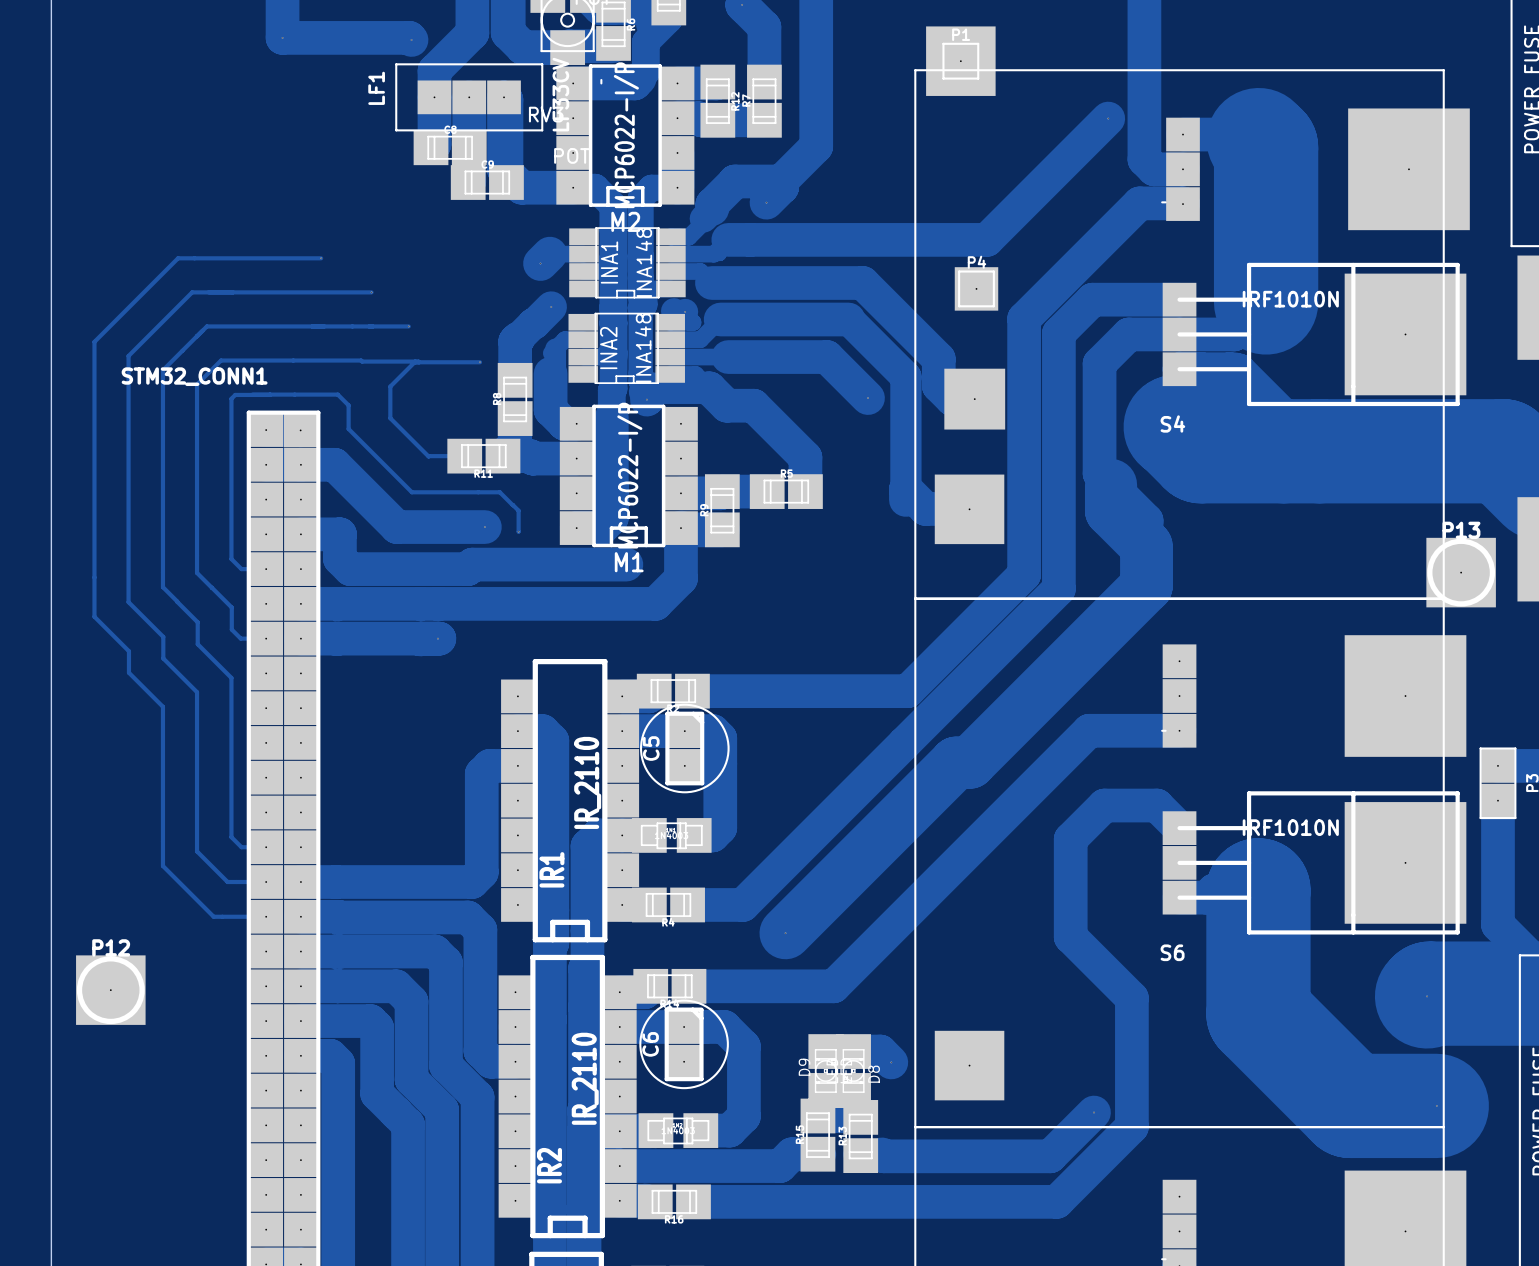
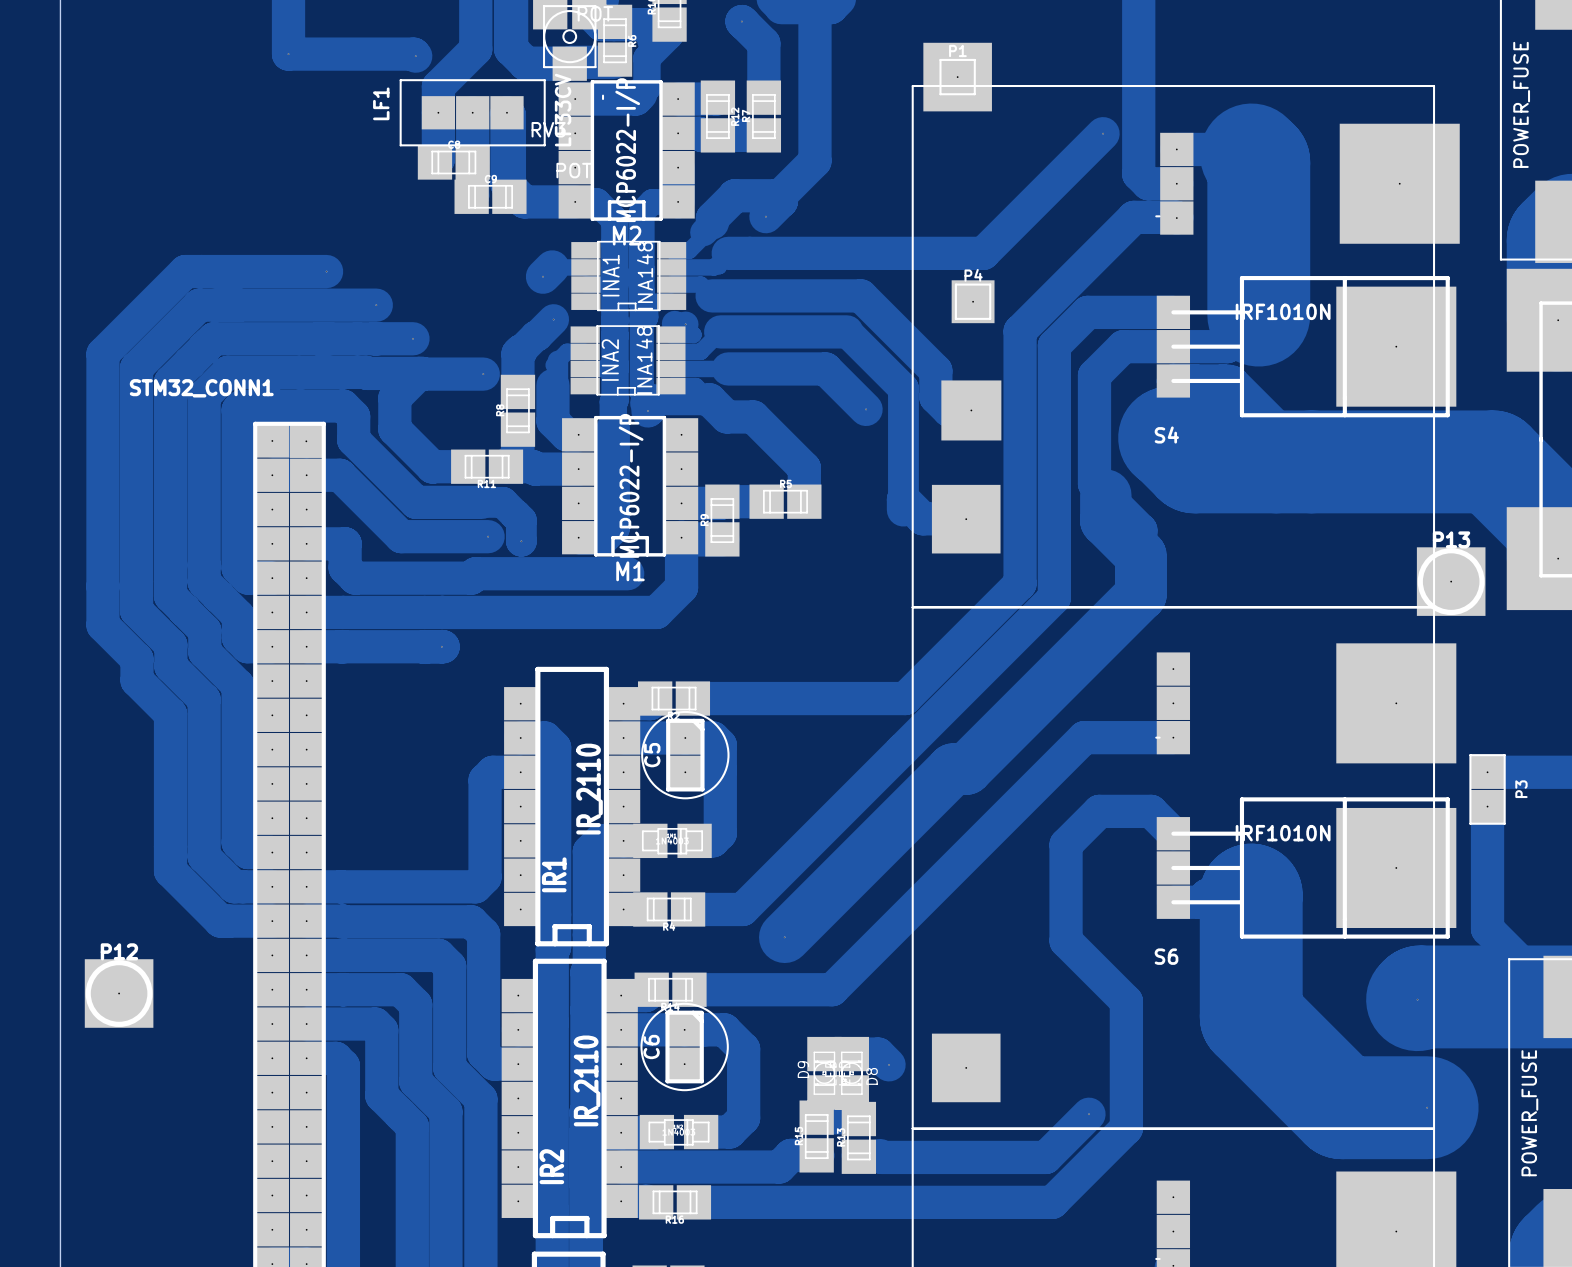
track width: thin (321, 258) (178, 258) (94, 341) (94, 616) (128, 651) (128, 672) (162, 706) (162, 866) (213, 916) (266, 916) -> thick (326, 271) (185, 271) (102, 354) (102, 625) (136, 659) (136, 680) (170, 713) (170, 871) (220, 921) (272, 921)
track width: thin (371, 292) (192, 292) (128, 356) (128, 602) (163, 636) (163, 658) (197, 692) (197, 851) (227, 882) (266, 882) -> thick (376, 305) (199, 305) (136, 367) (136, 610) (170, 645) (170, 666) (204, 699) (204, 856) (234, 886) (272, 886)
track width: thin (408, 326) (206, 326) (162, 370) (162, 587) (197, 622) (197, 644) (231, 677) (231, 837) (241, 847) (266, 847) -> thick (413, 338) (213, 338) (170, 381) (170, 596) (204, 630) (204, 652) (238, 685) (238, 842) (248, 852) (272, 852)
track width: thin (419, 362) (221, 360) (197, 384) (197, 572) (211, 587) -> thick (423, 374) (227, 372) (204, 396) (204, 581) (218, 596)
track width: thin (480, 362) (415, 361) (390, 386) (390, 418) (428, 456) (464, 456) -> thick (483, 374) (419, 373) (394, 398) (394, 429) (432, 467) (468, 466)
track width: thin (252, 394) (337, 394) (348, 405) (348, 429) (411, 492) (499, 492) (518, 510) (518, 531) -> thick (259, 405) (343, 405) (353, 416) (353, 439) (416, 502) (502, 502) (521, 520) (521, 541)
track width: thin (270, 394) (235, 394) (231, 398) (231, 559) (241, 569) (266, 569) -> thick (276, 405) (241, 406) (238, 410) (238, 568) (248, 578) (272, 578)
track width: thin (212, 587) (231, 607) (231, 629) (240, 638) (266, 638) -> thick (218, 596) (238, 616) (238, 637) (247, 646) (272, 646)

